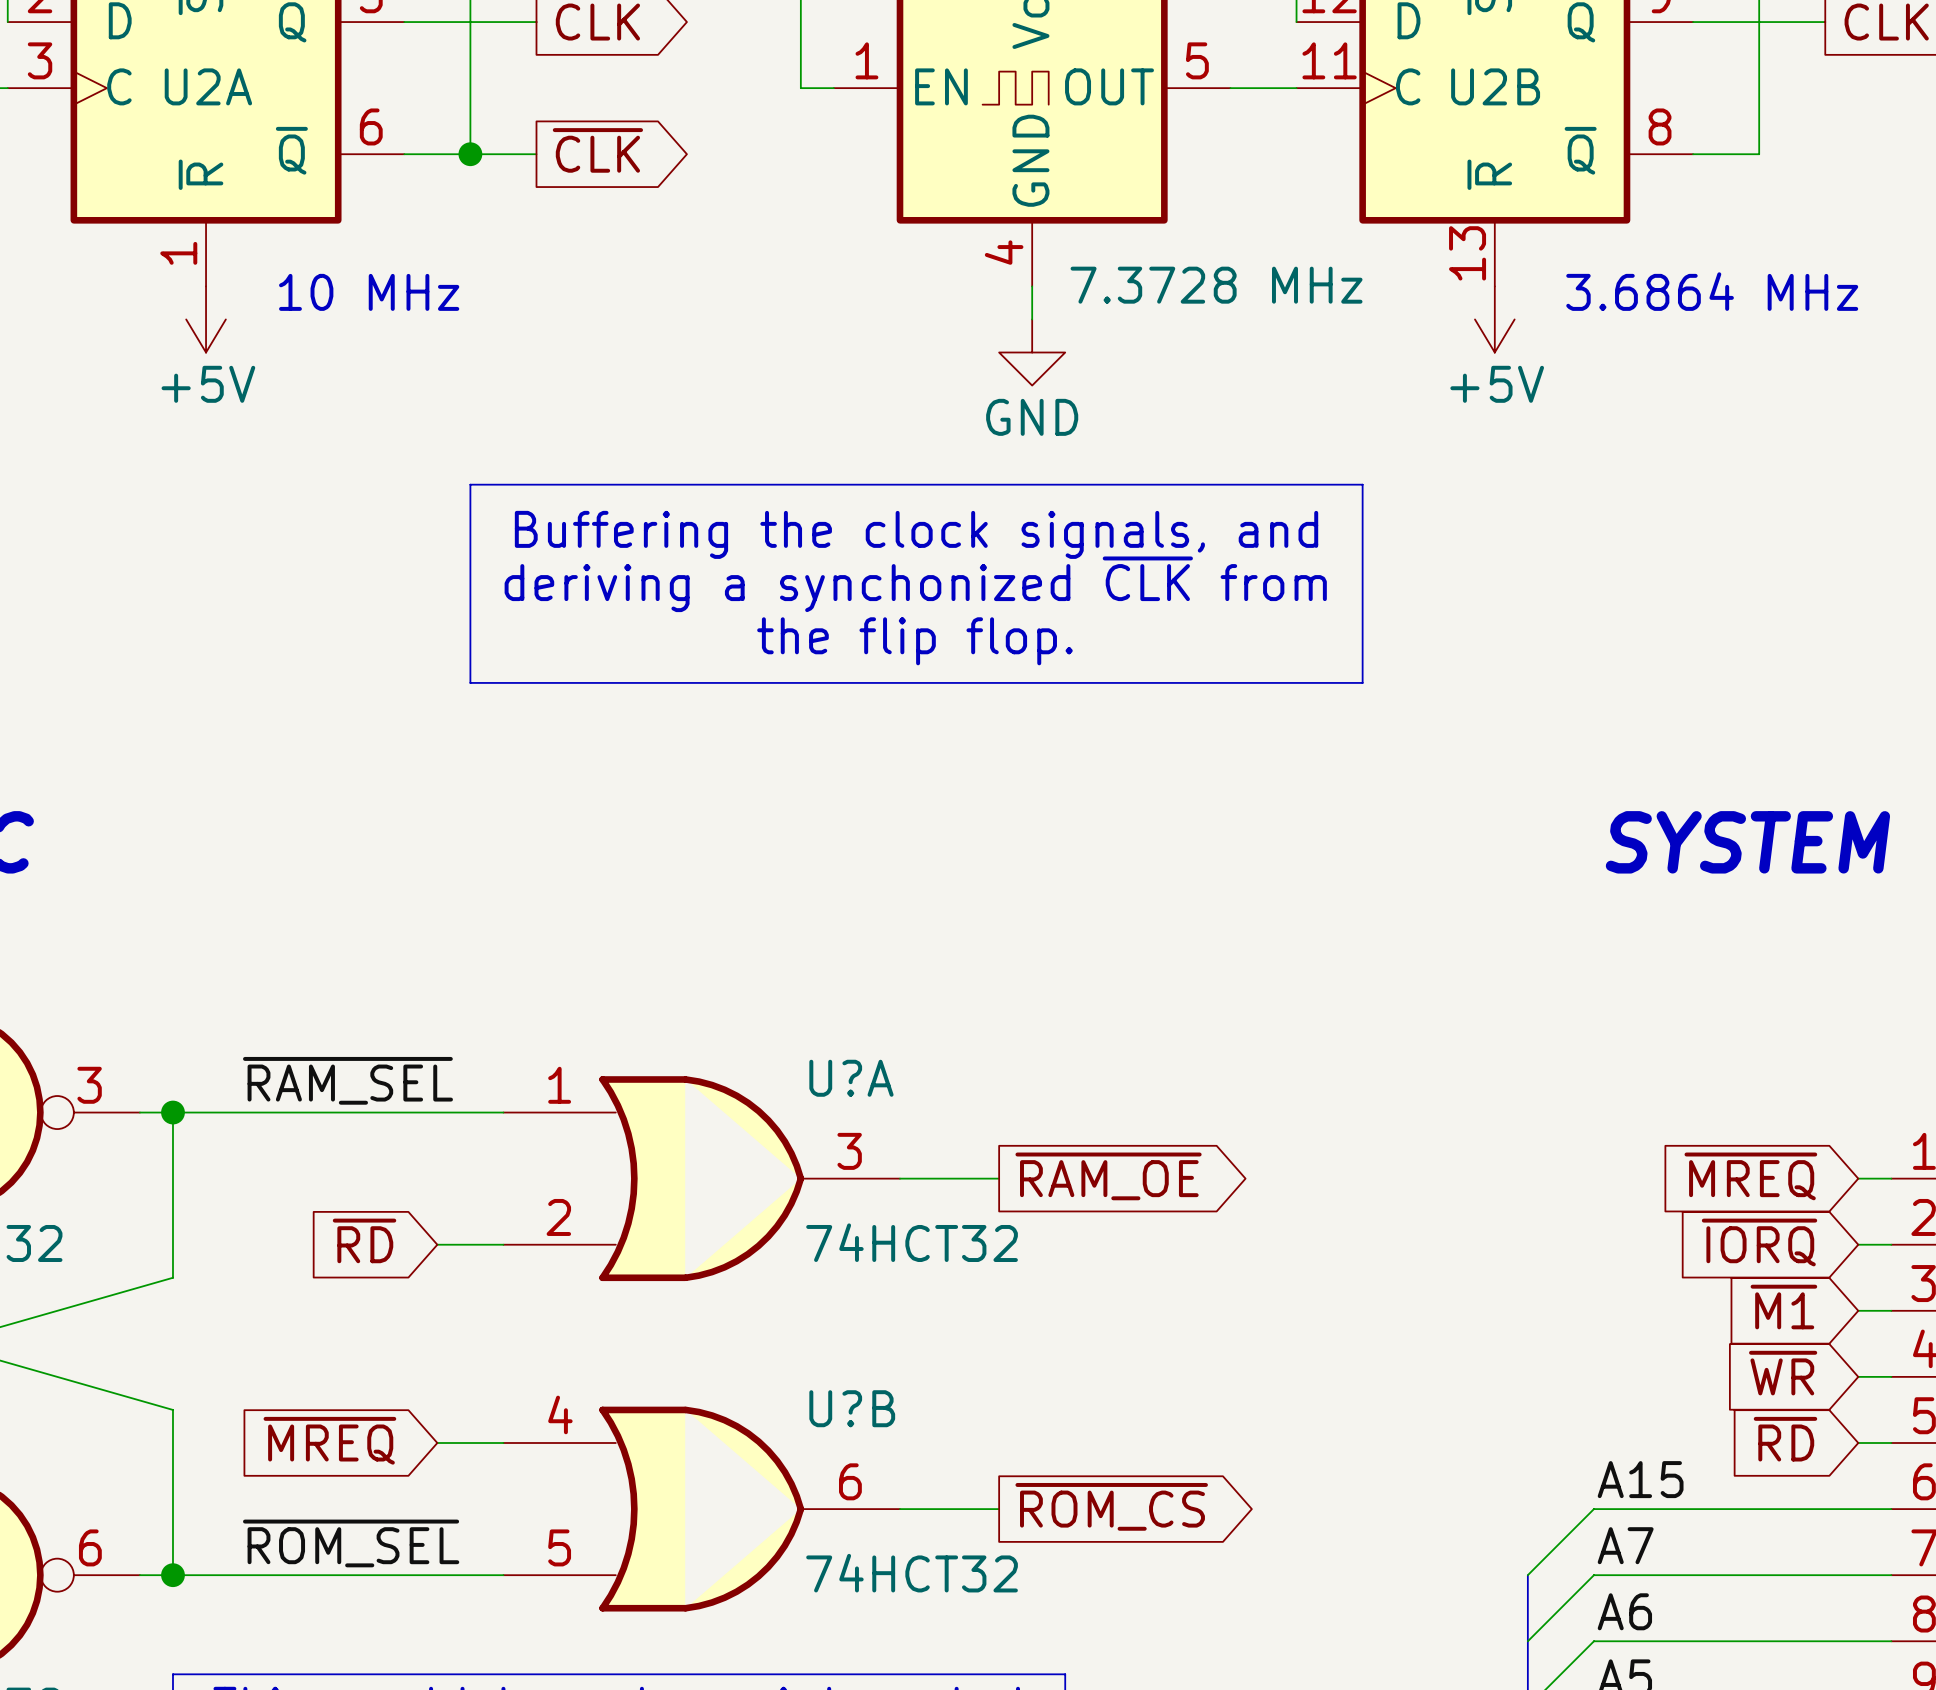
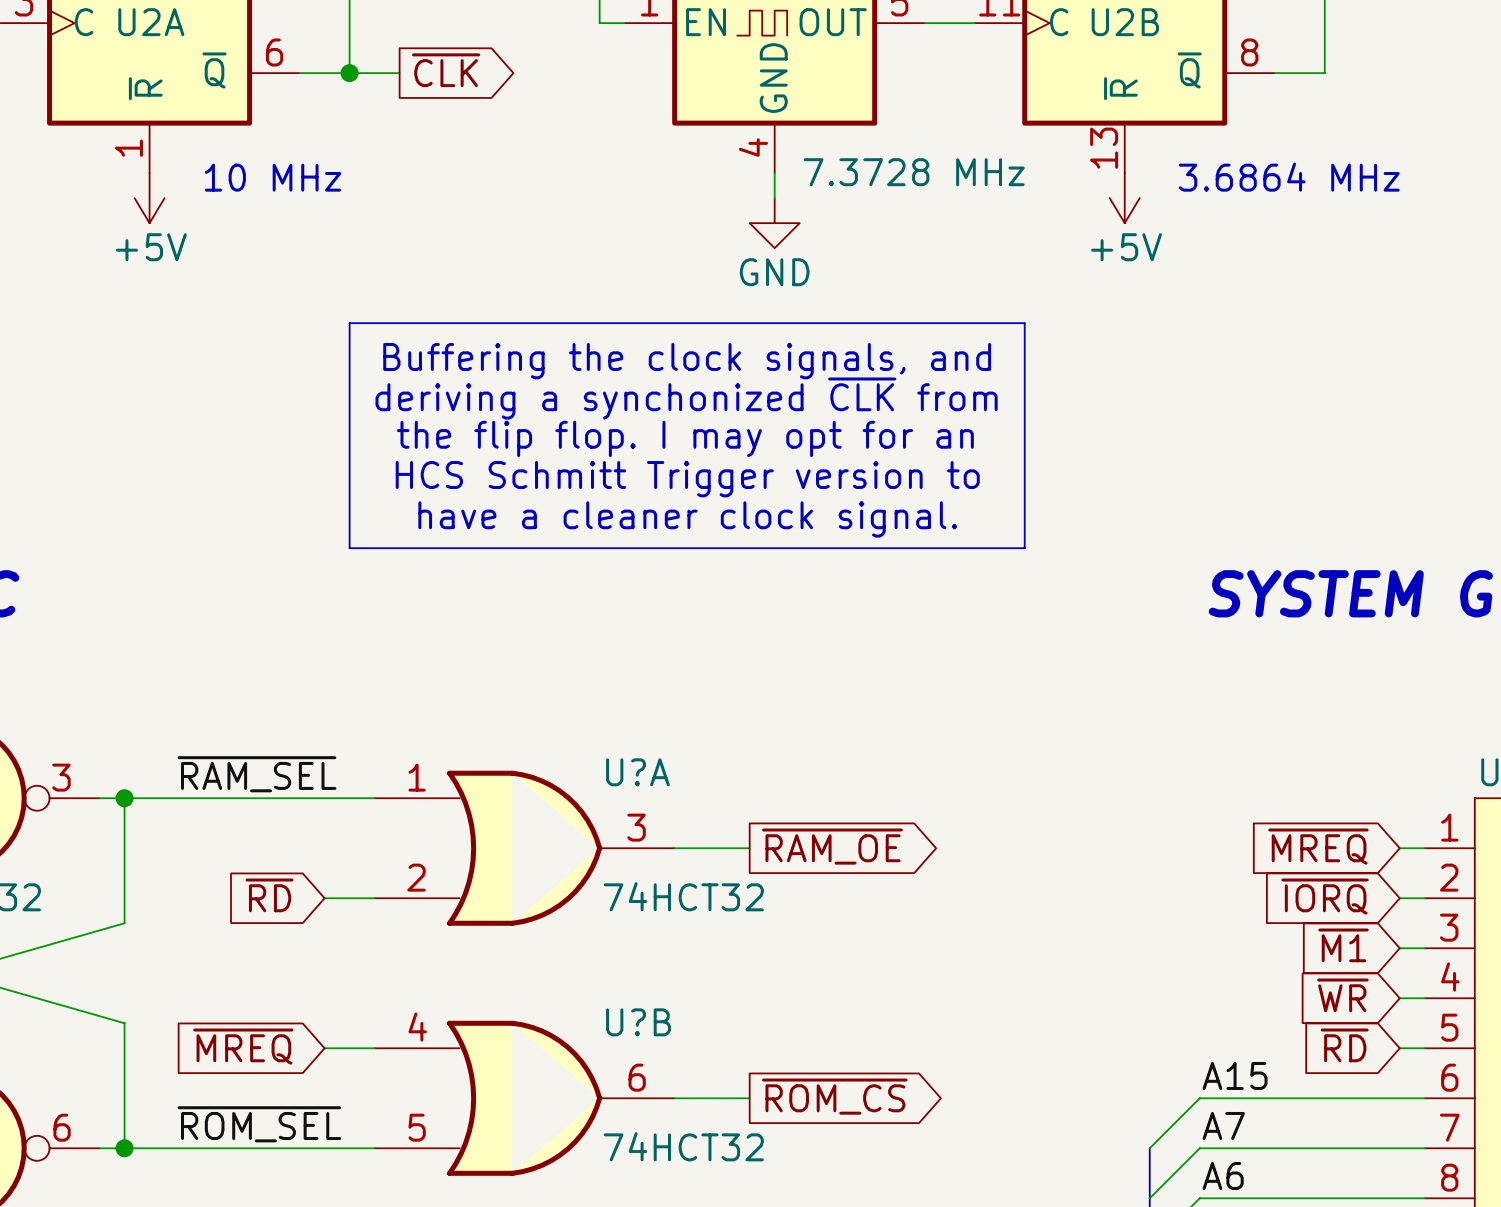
text: the flip flop. (914, 641) -> the flip flop. I may opt for an (685, 438)
line: (470, 682) (1362, 682) -> (349, 473) (349, 548) (1024, 548) (1024, 473)
text: none -> HCS Schmitt Trigger version to (687, 479)
text: none -> have a cleaner clock signal. (687, 519)

